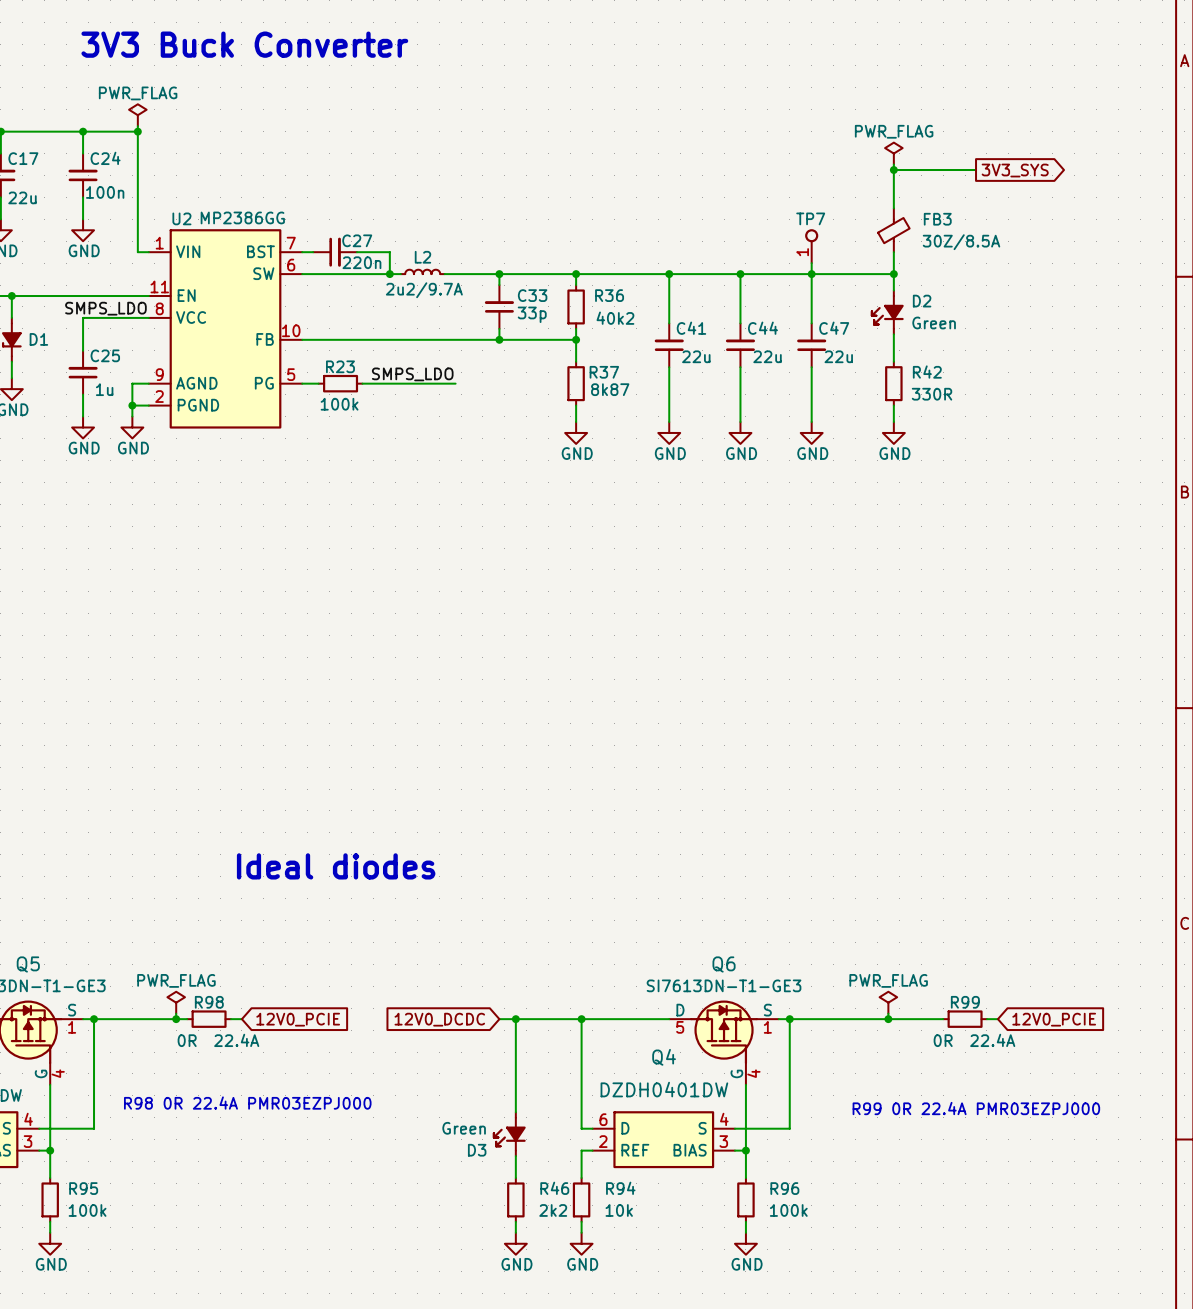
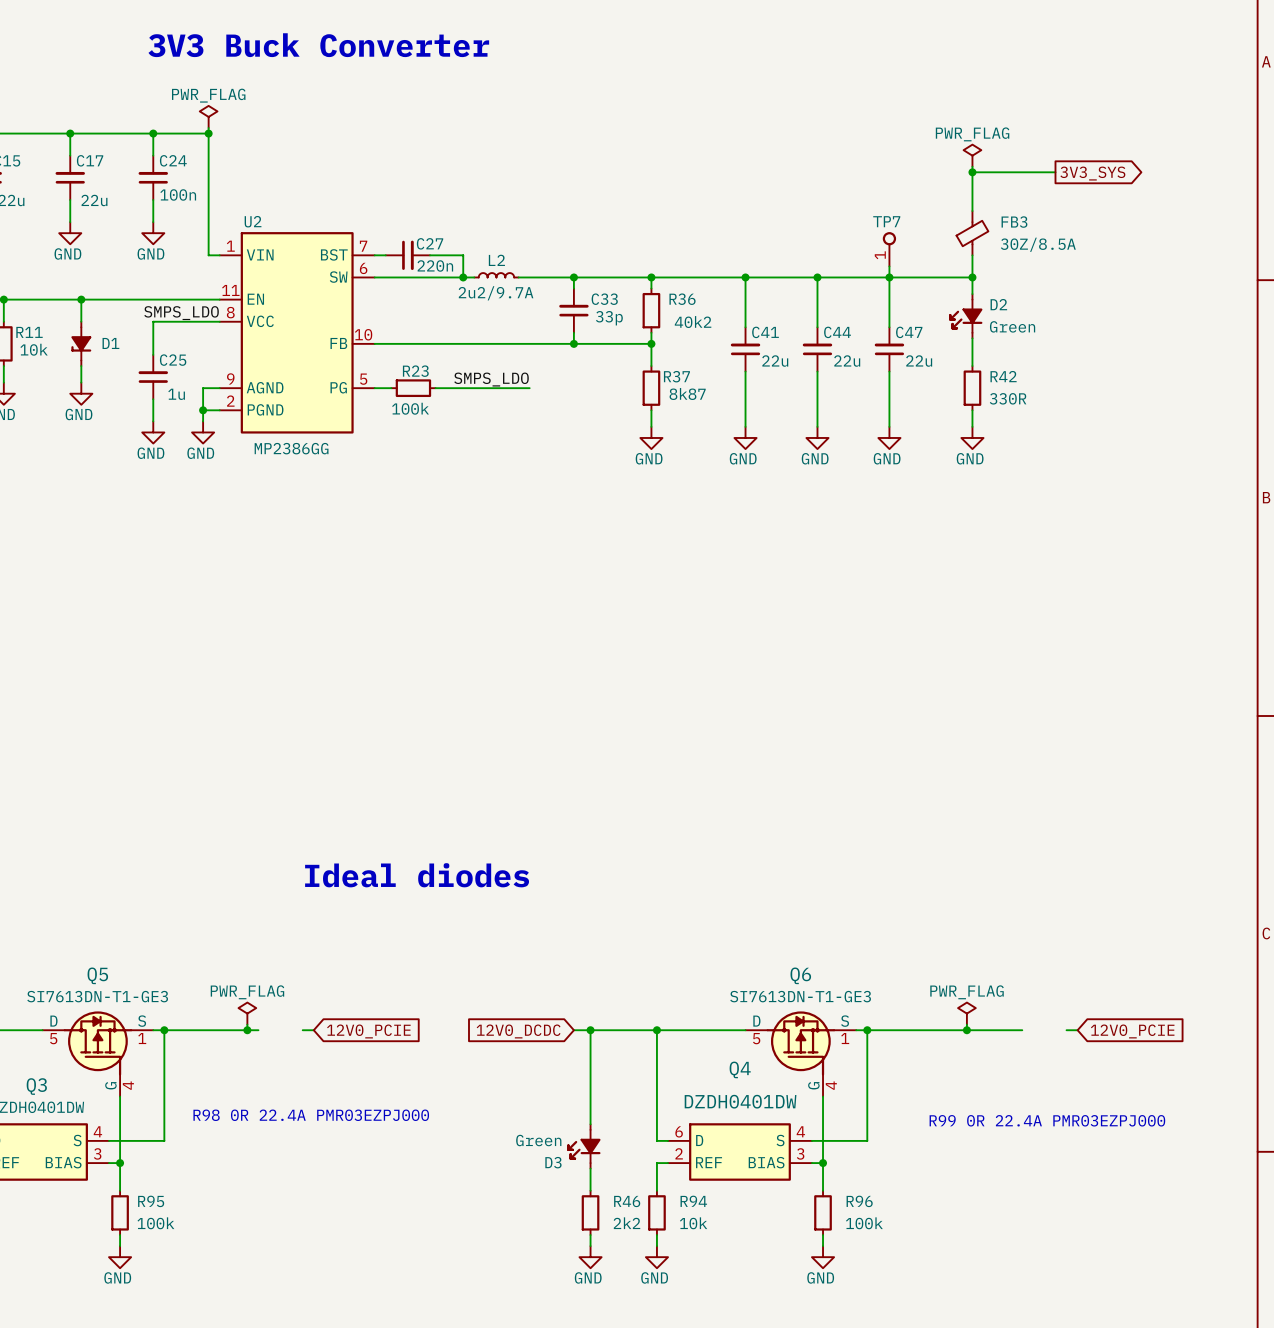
U2 value position: MP2386GG (242, 217) -> MP2386GG (291, 448)
R98: (209, 1019) -> none
R99: (965, 1019) -> none

